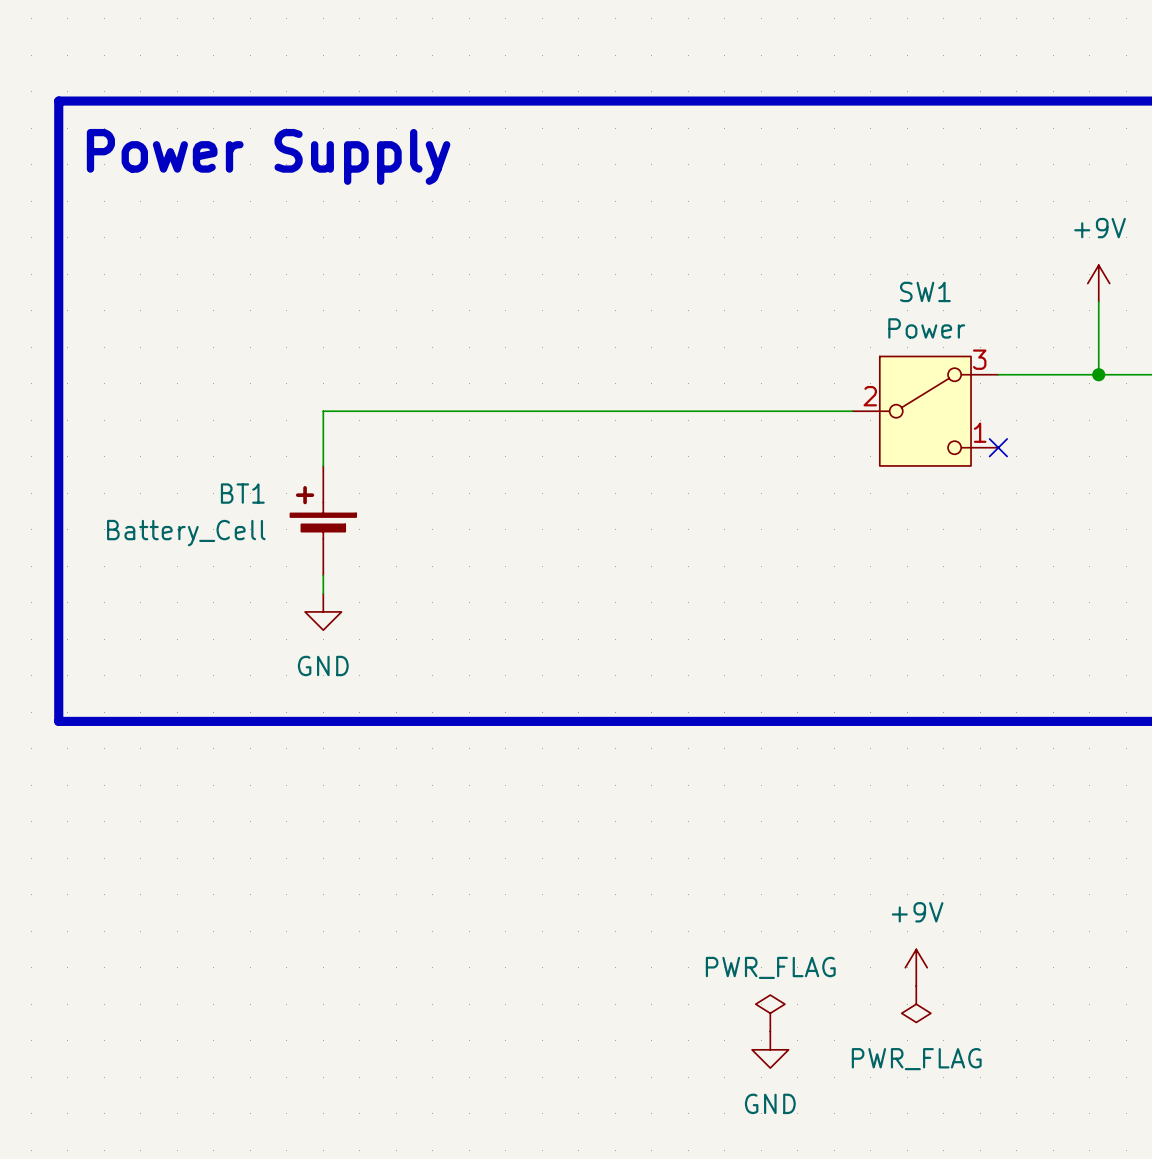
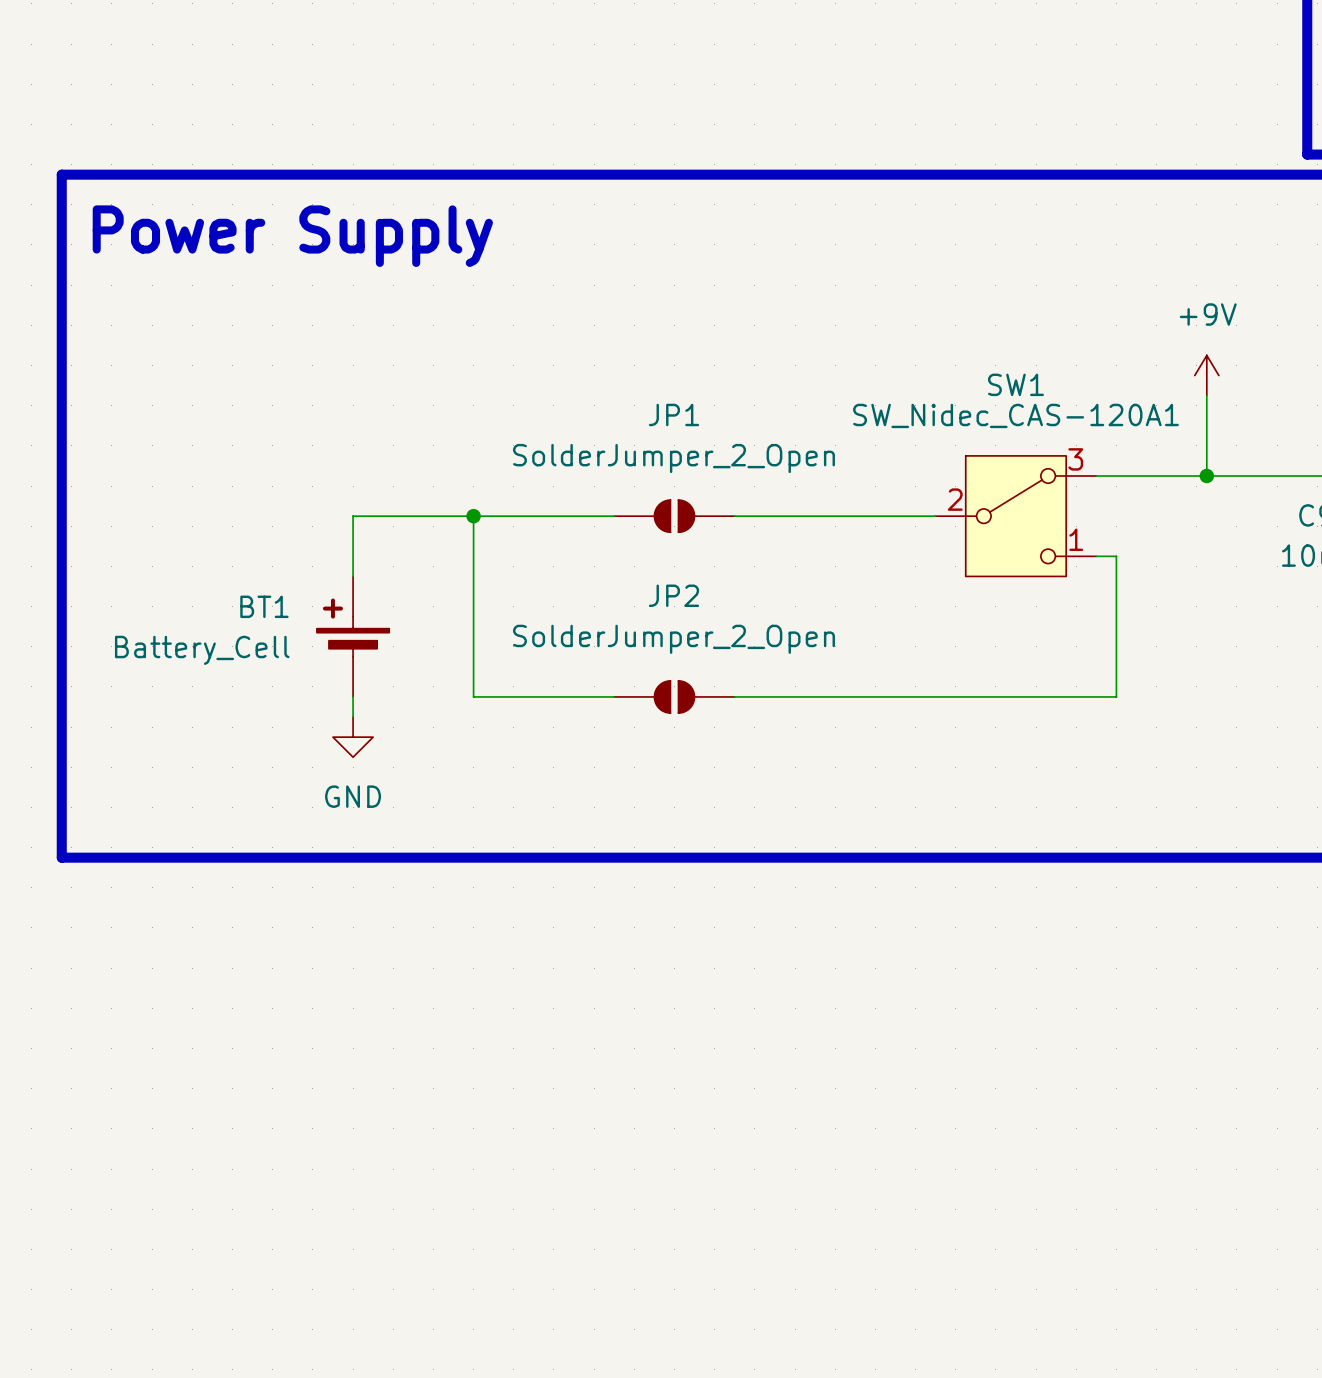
SW1 value: Power (926, 328) -> SW_Nidec_CAS-120A1 (1015, 415)
wire: none -> (473, 516) (473, 696) (614, 696)
junction: none -> (473, 516)
JP1: none -> SolderJumper_2_Open (674, 516)
wire: none -> (1096, 556) (1116, 556) (1116, 696) (734, 696)
no-connect mark: (998, 447) -> none
JP2: none -> SolderJumper_2_Open (674, 696)
power symbol: +9V (916, 967) -> none
power symbol: PWR_FLAG (916, 1004) -> none
power symbol: PWR_FLAG (770, 1013) -> none
power symbol: GND (770, 1049) -> none

